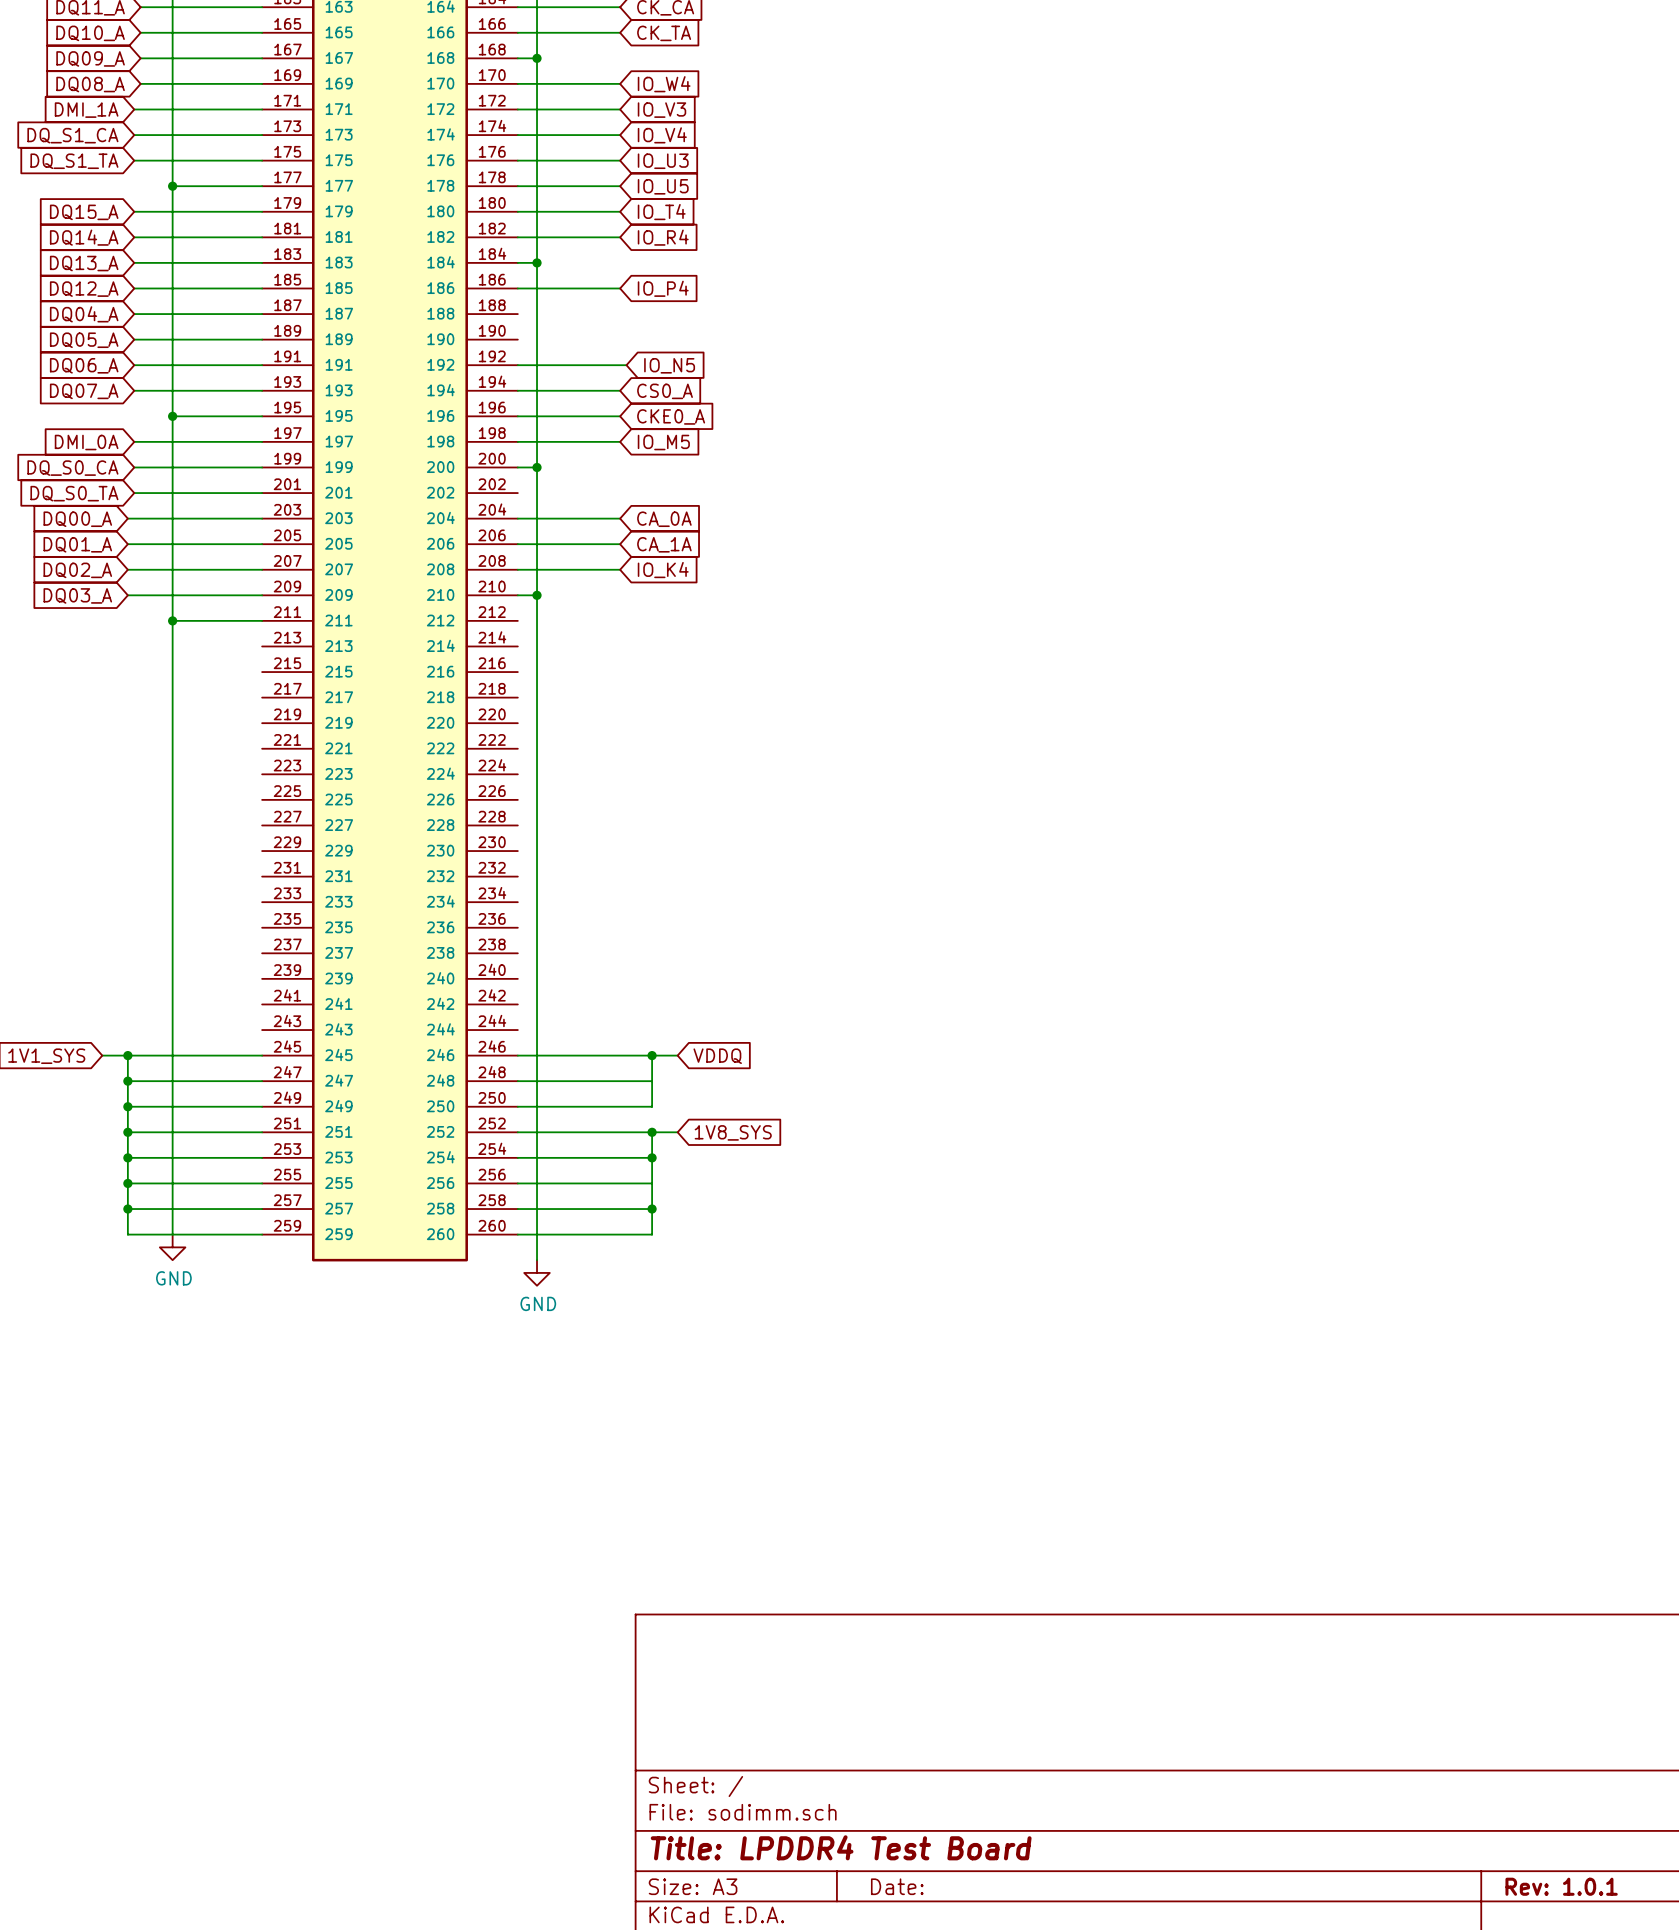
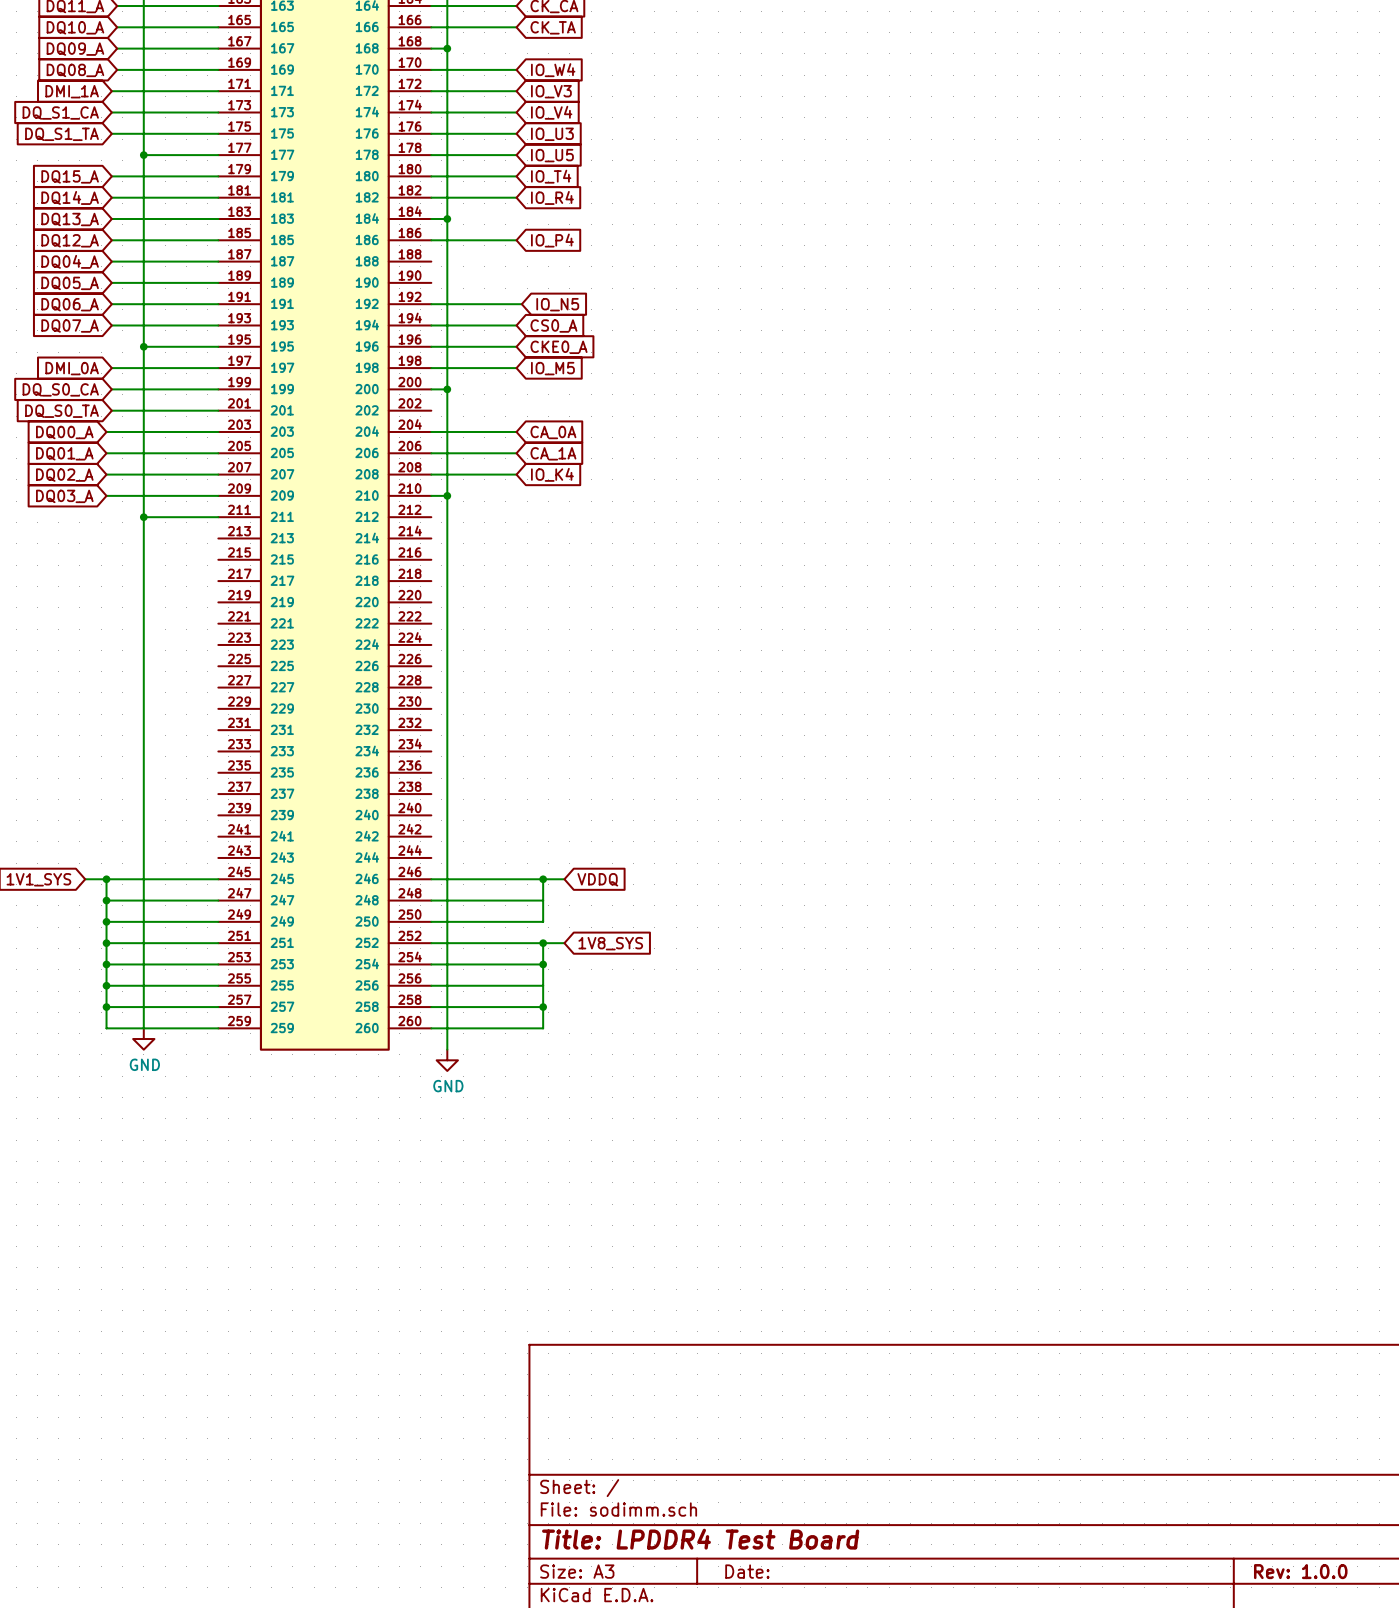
title block: Rev: 1.0.1 (1561, 1886) -> Rev: 1.0.0 (1300, 1571)

